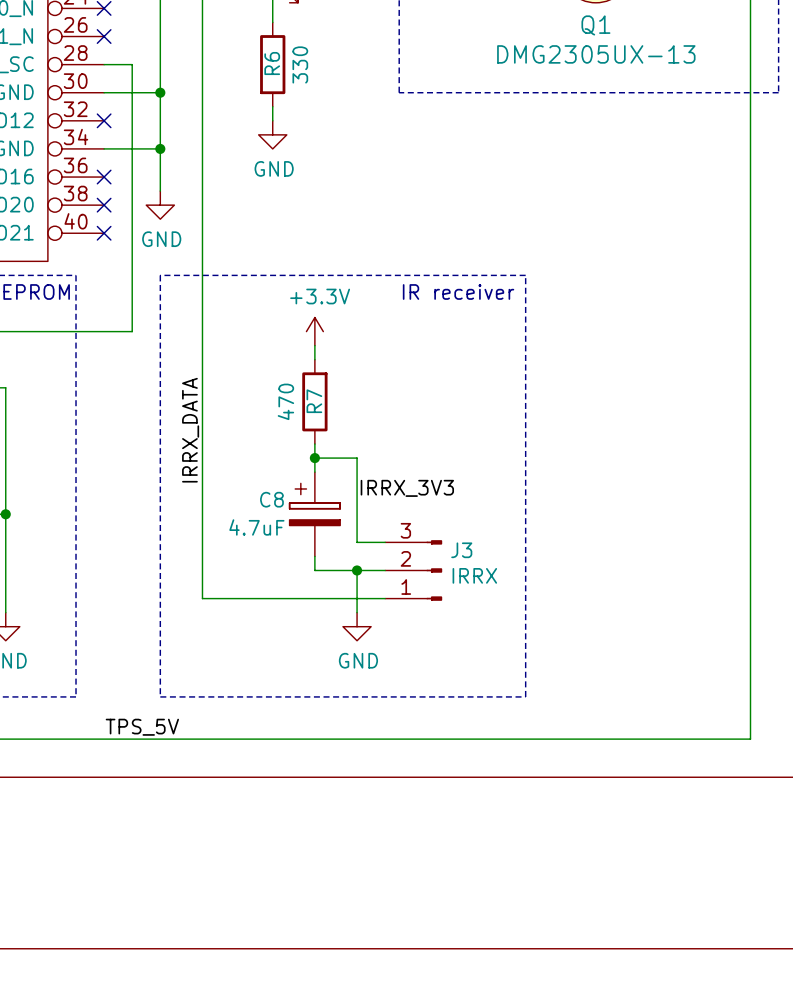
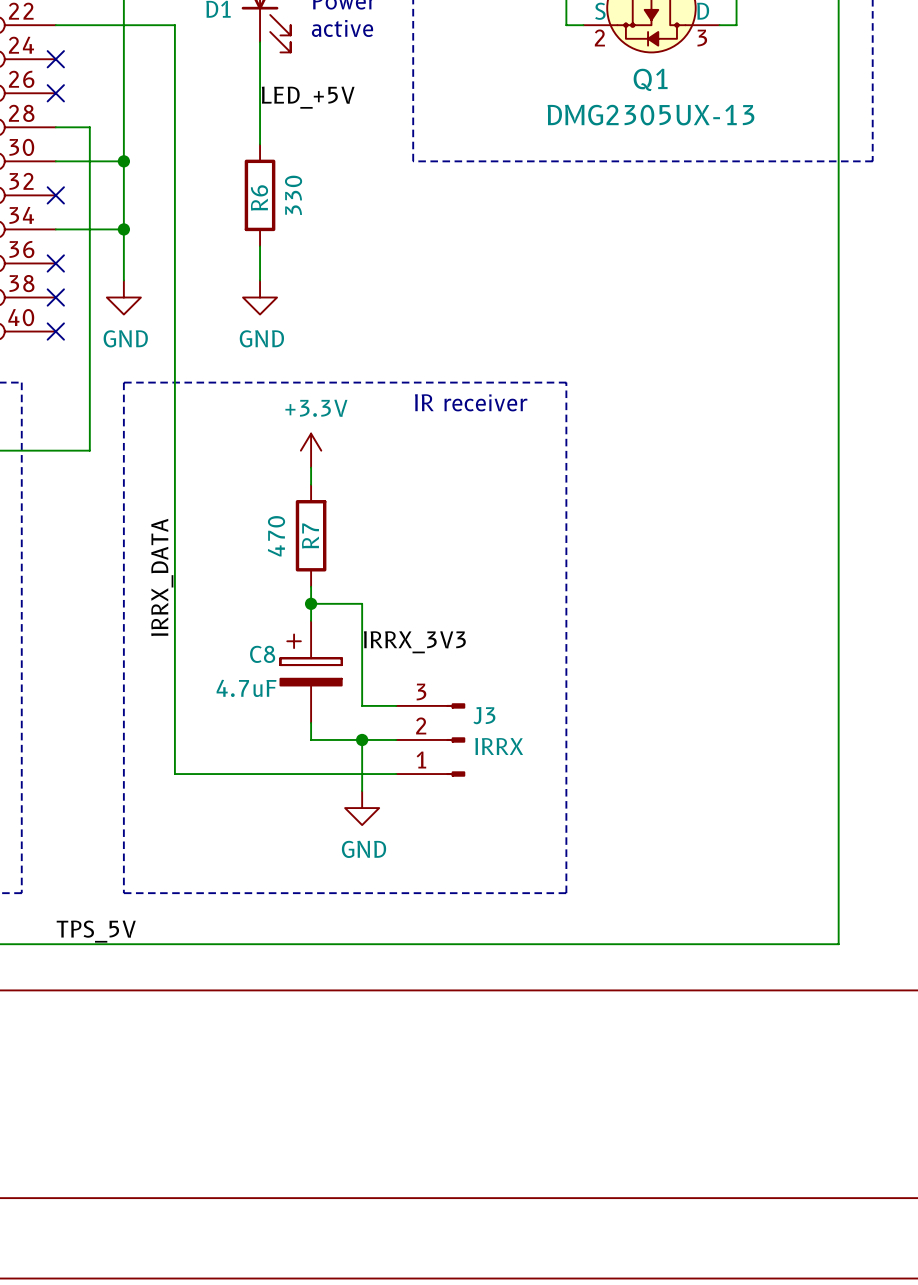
wire: none -> (260, 76) (260, 144)
label: none -> LED_+5V (308, 97)
R6 position: (272, 64) -> (260, 195)
wire: (272, 106) (272, 120) -> none
power symbol position: GND (272, 134) -> GND (260, 297)
wire: none -> (260, 246) (260, 280)

